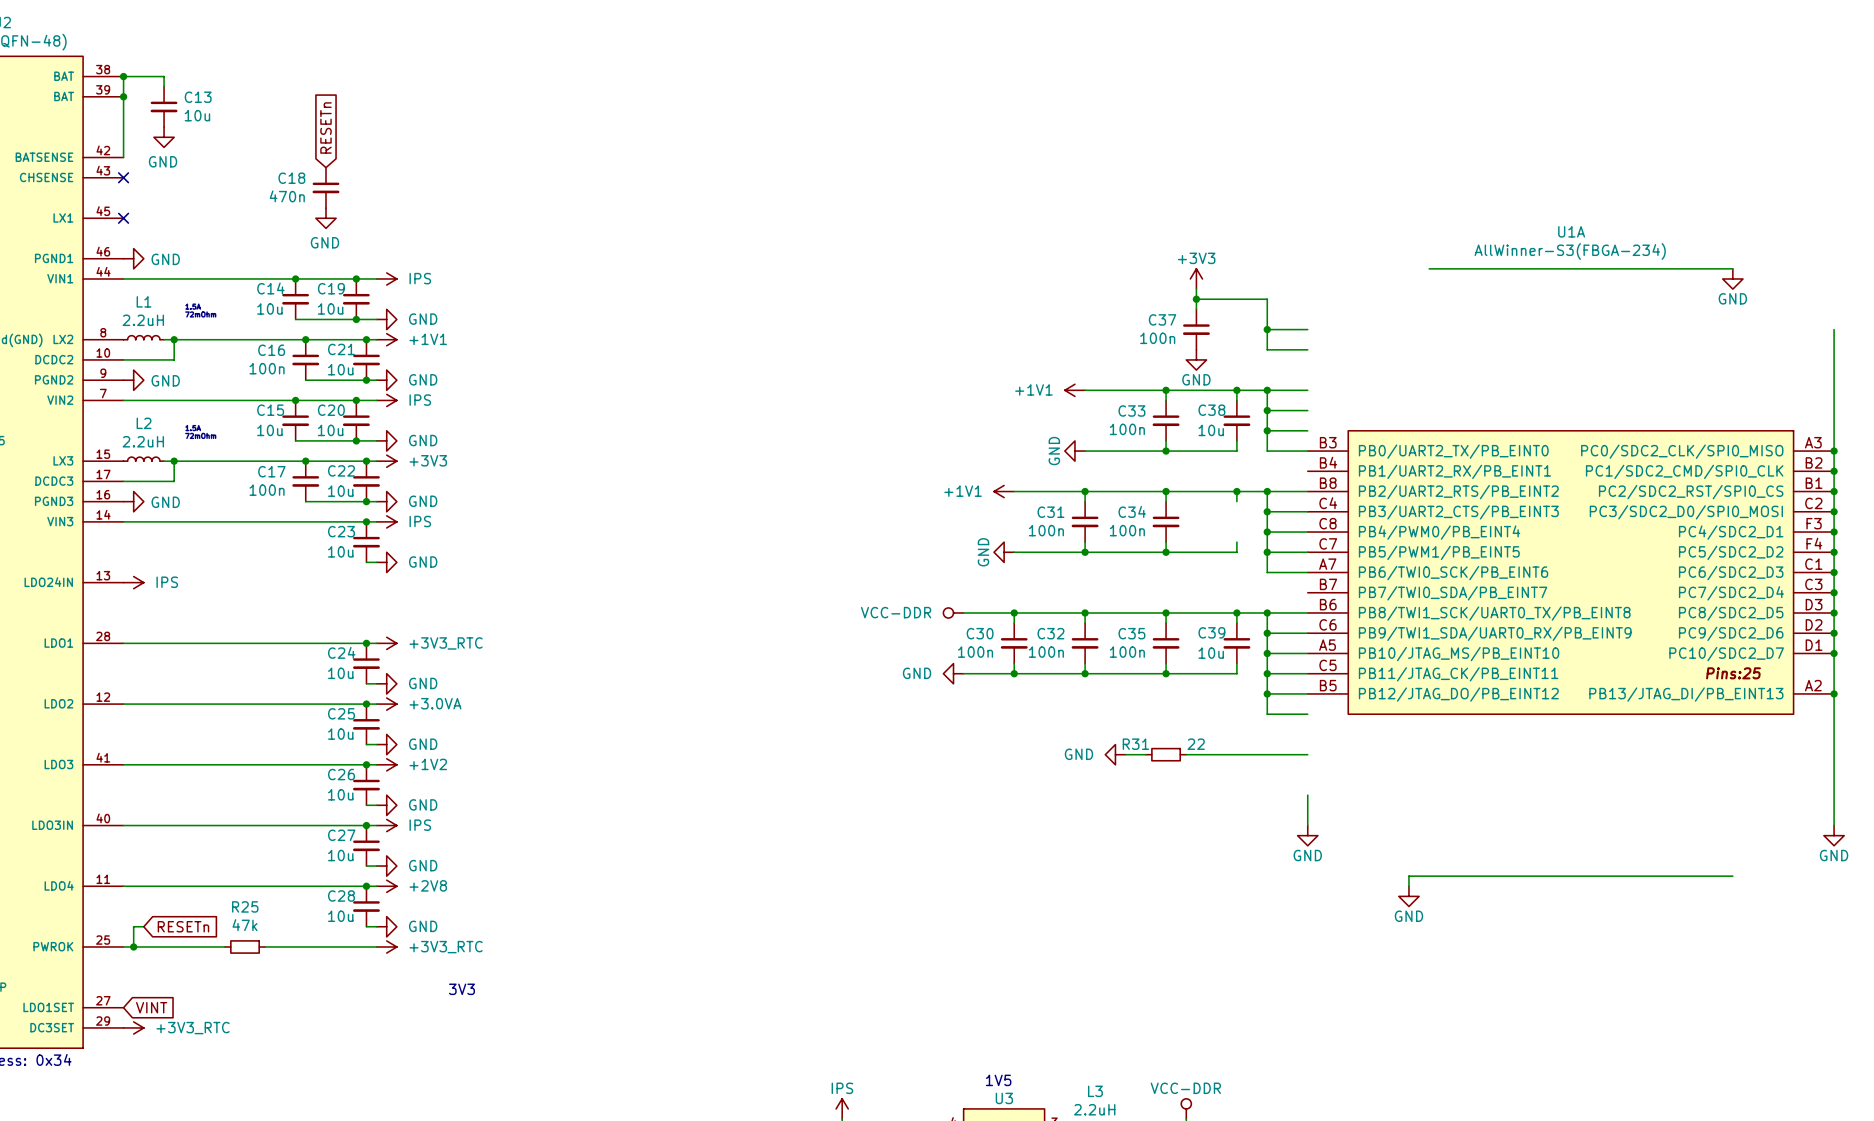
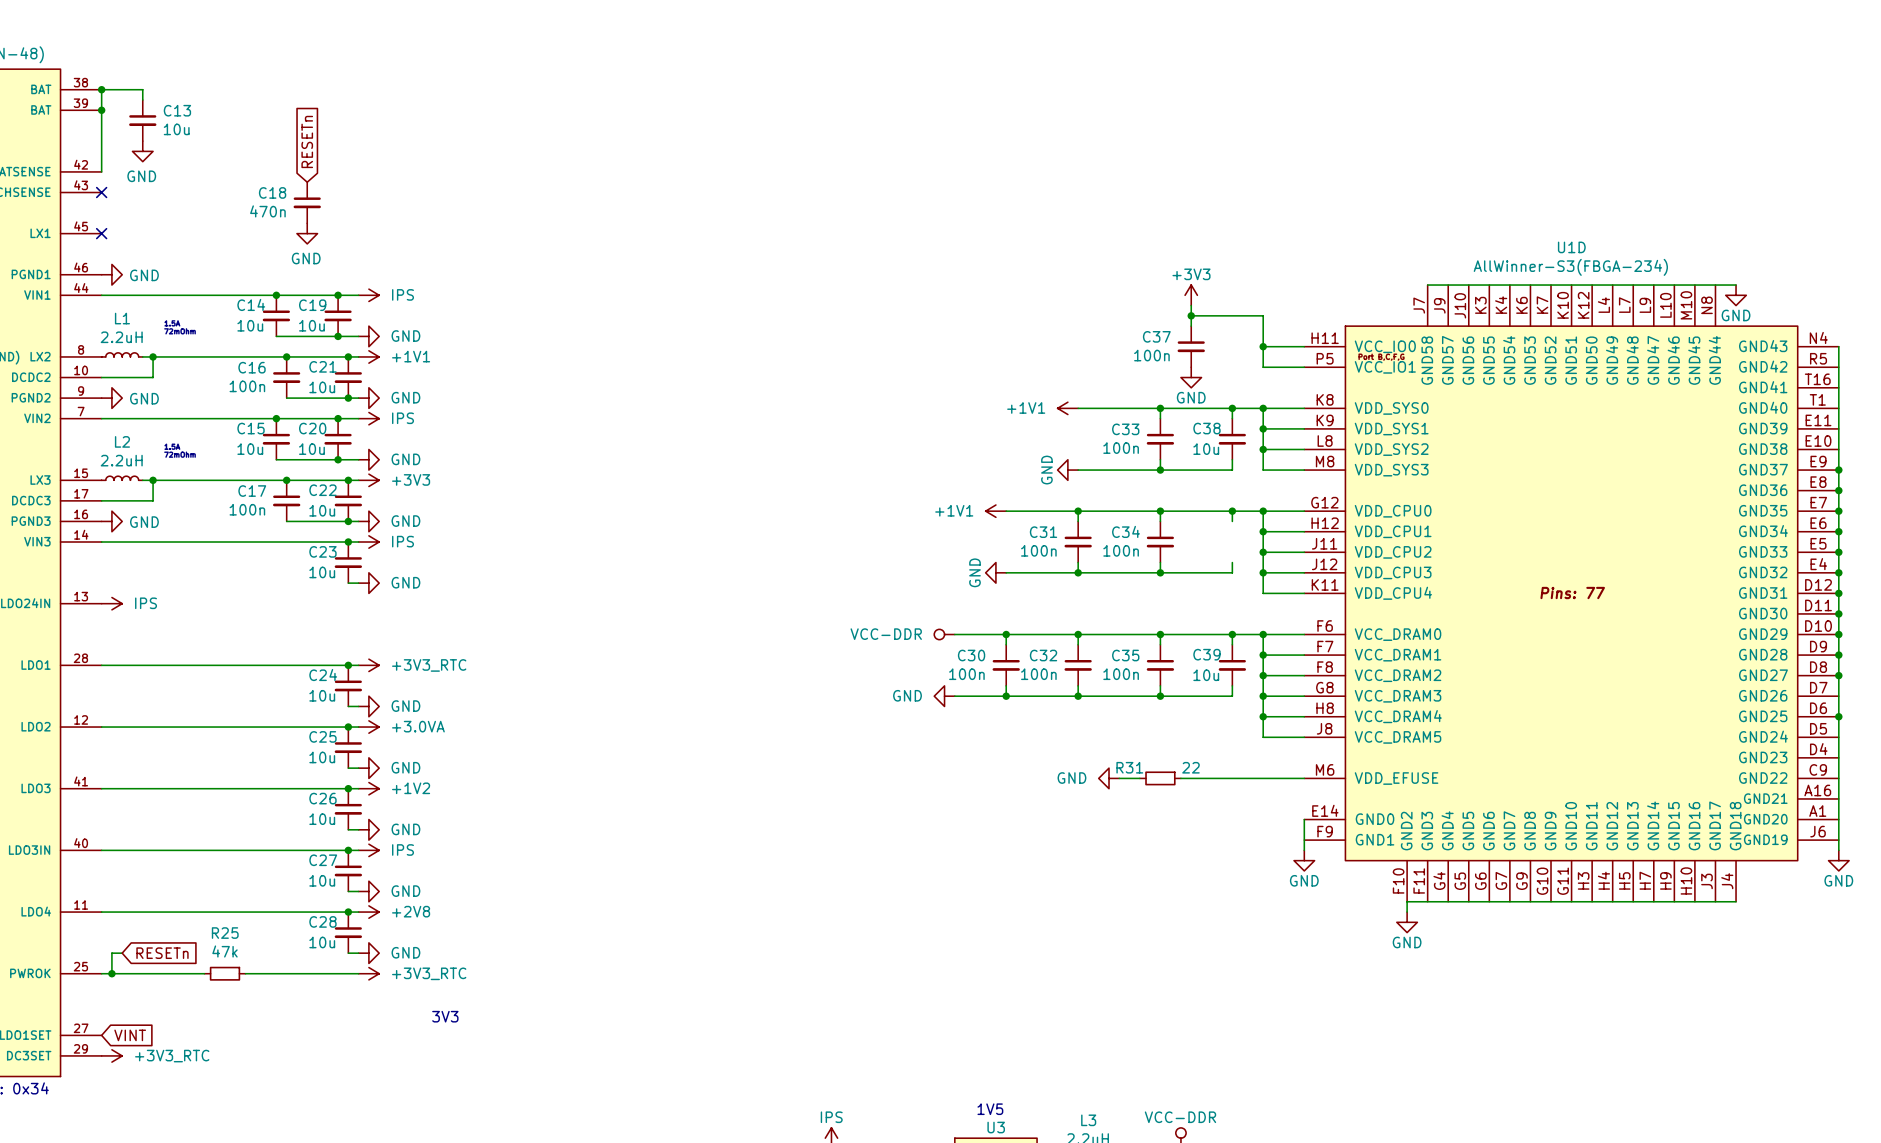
U1A: AllWinner-S3(FBGA-234) (1570, 572) -> none
U1D: none -> AllWinner-S3(FBGA-234) (1571, 593)

